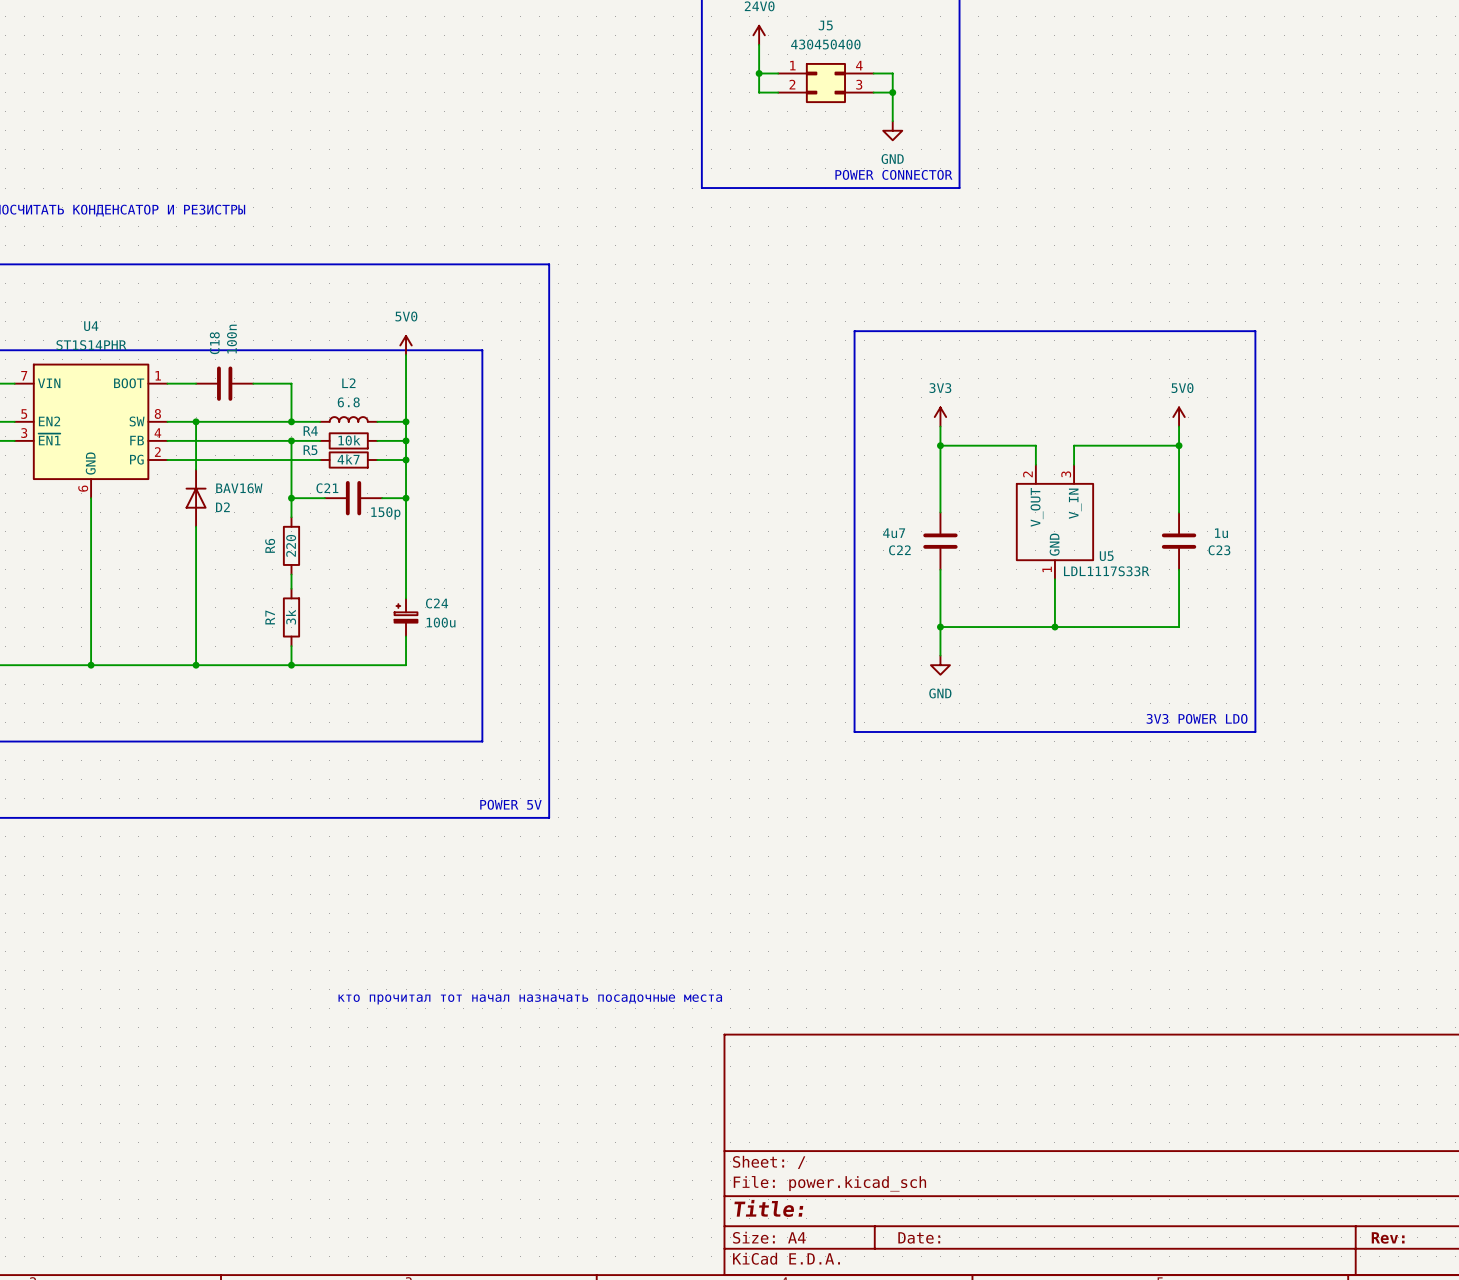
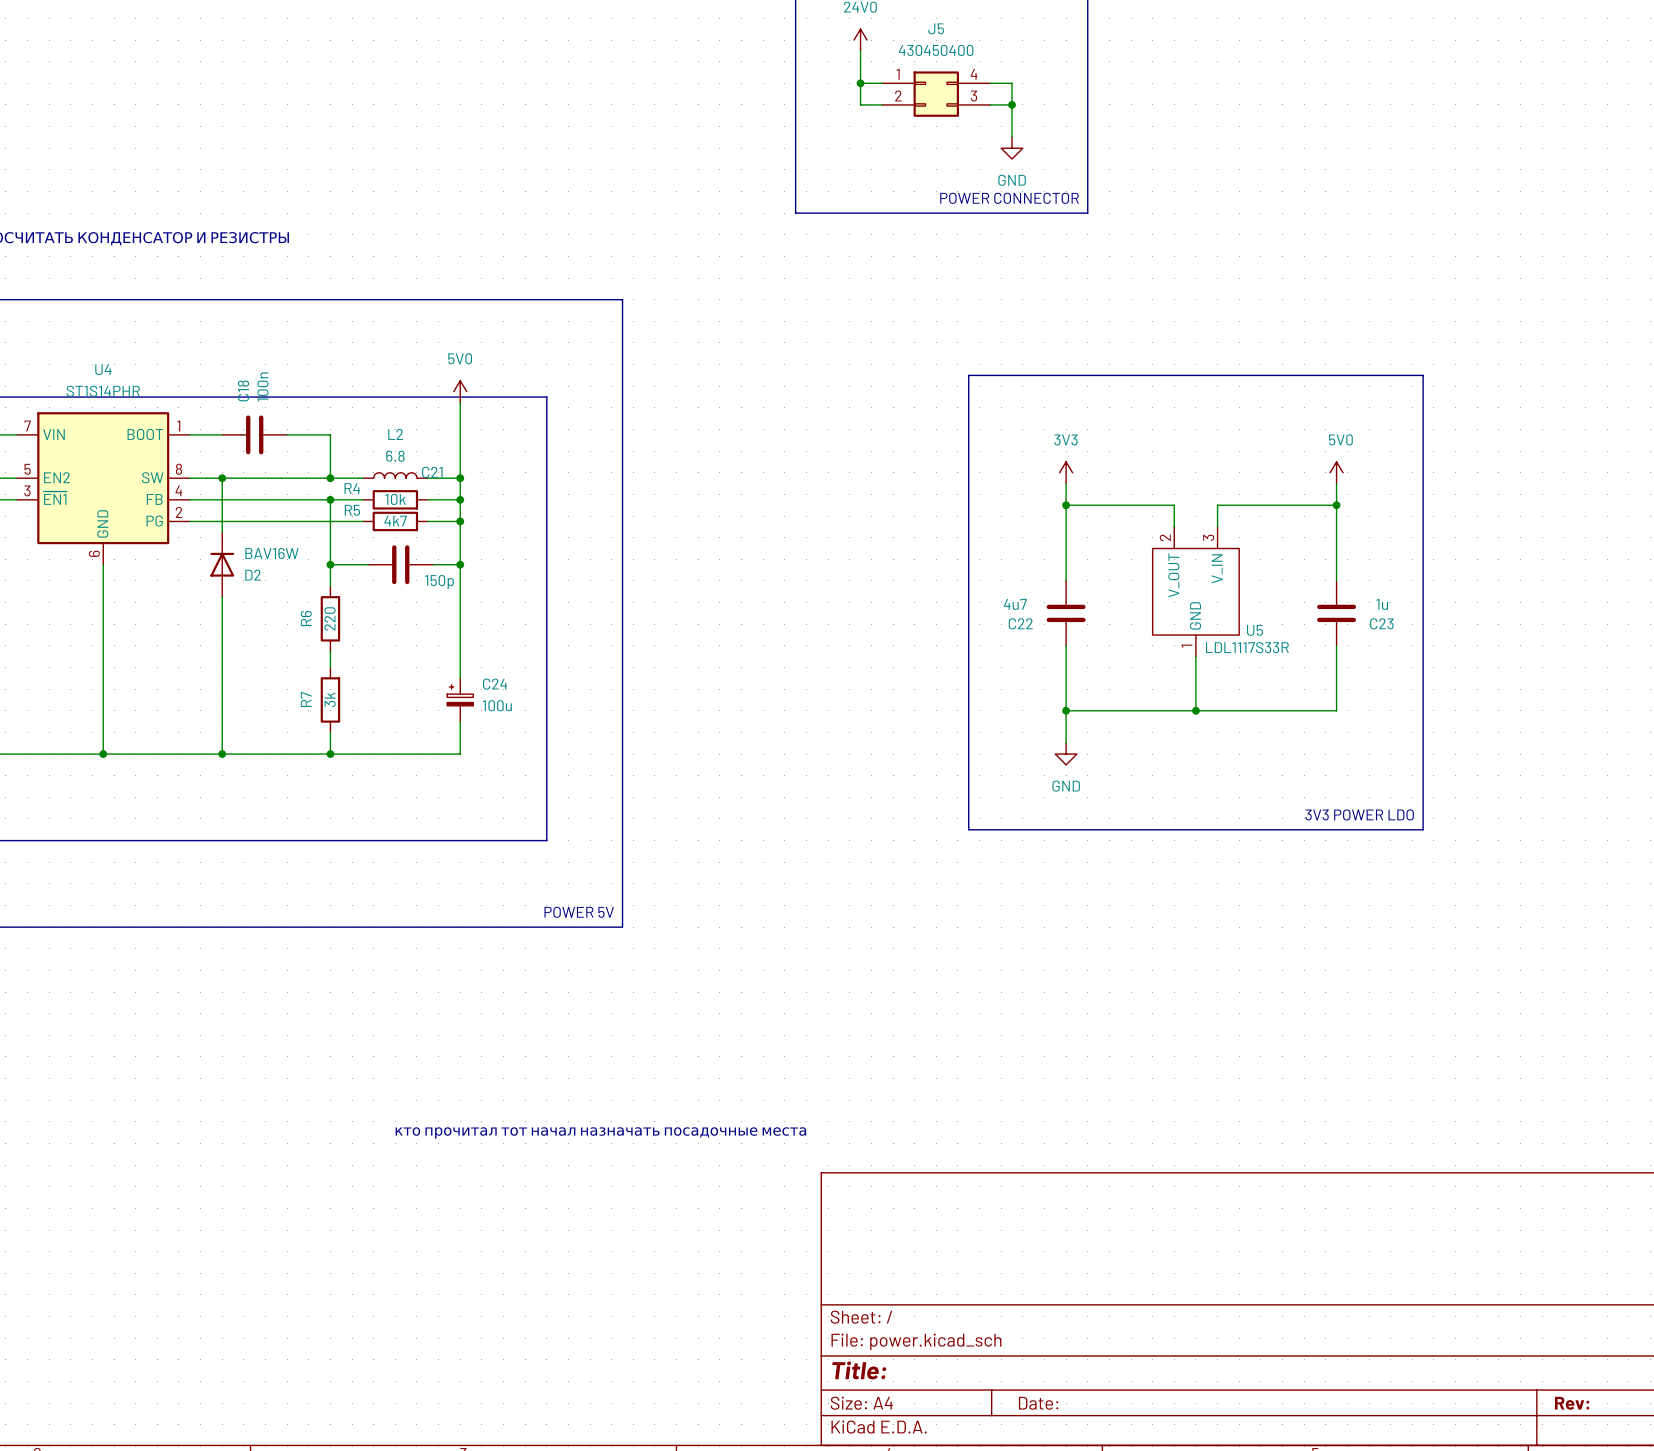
C21 name position: C21 (327, 488) -> C21 (432, 472)

